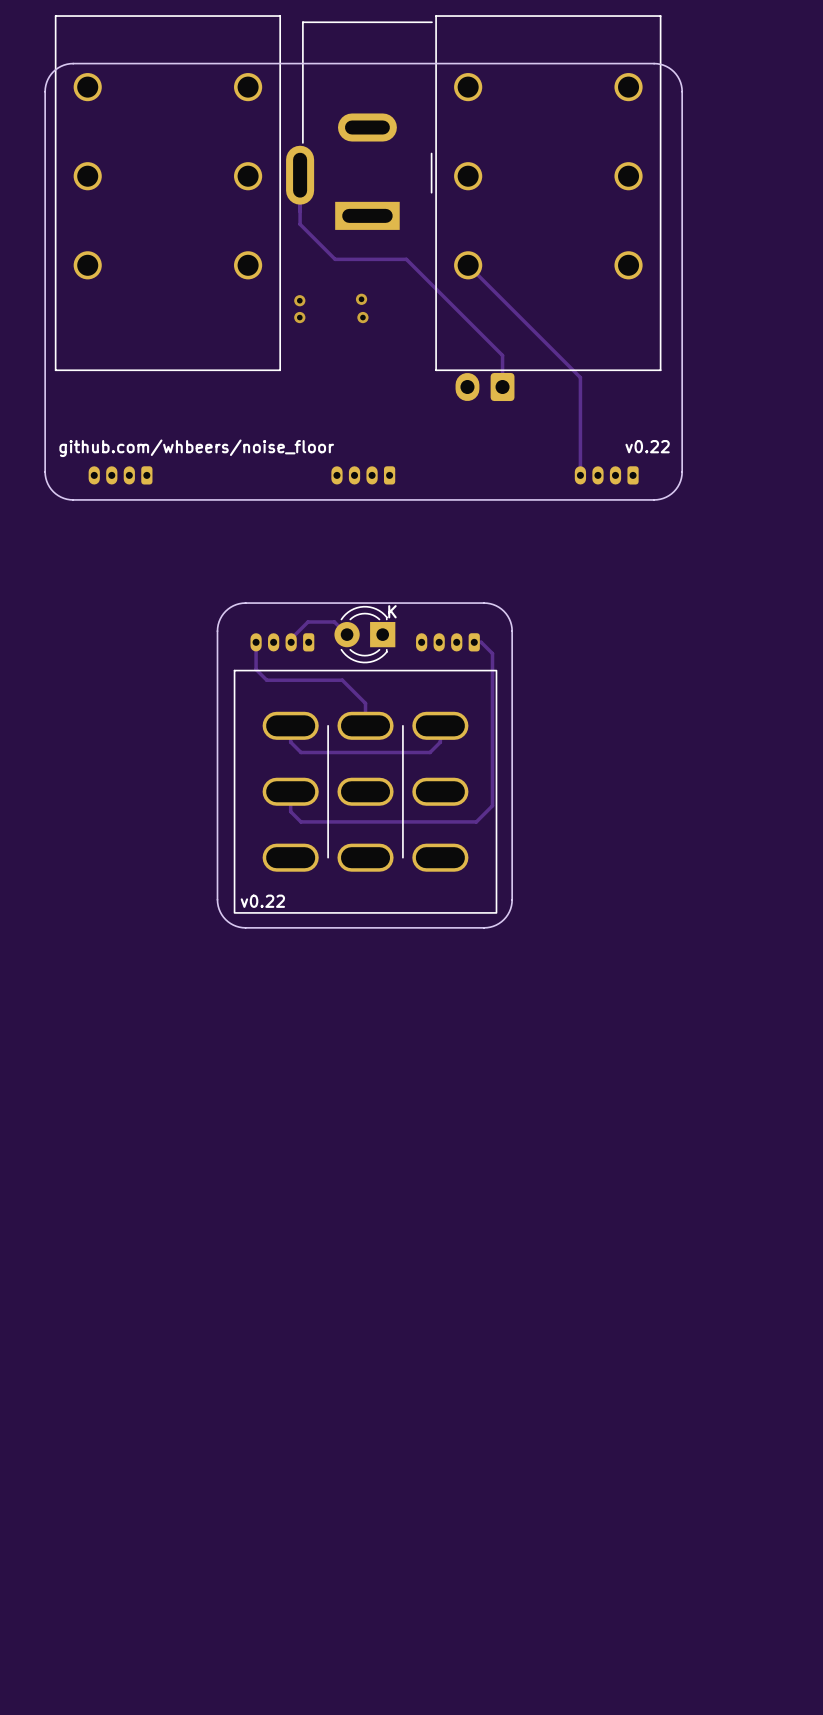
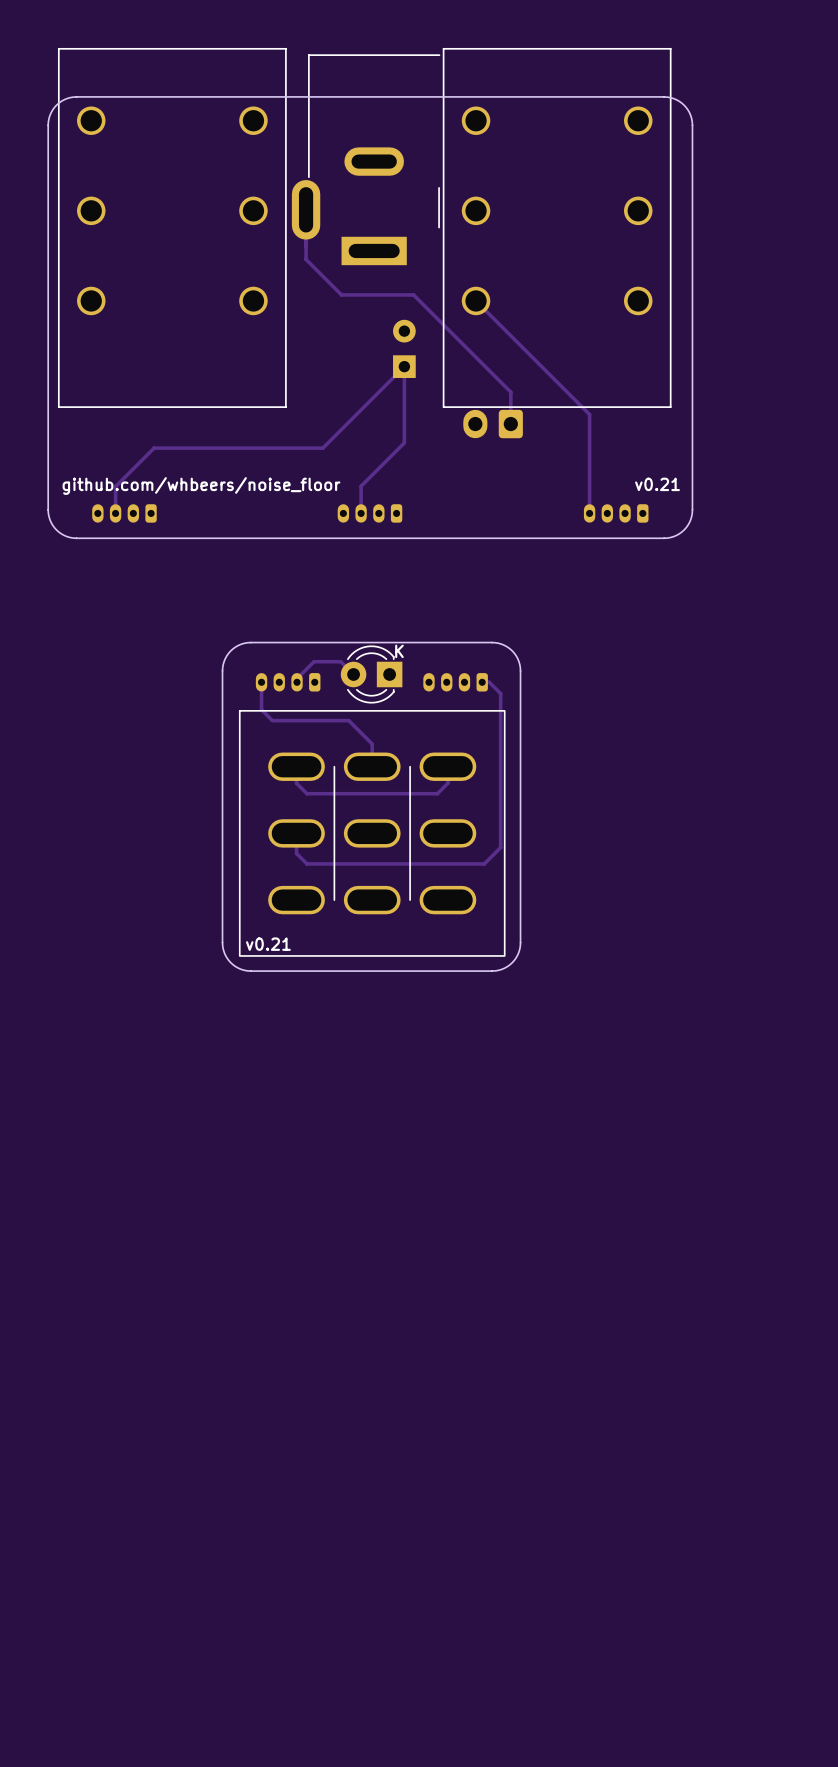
via: (361, 299) -> none
via: (299, 300) -> none
part: none -> (404, 348)
via: (299, 317) -> none
via: (362, 317) -> none
text: github.com/whbeers/noise_floor v0.22 (364, 448) -> github.com/whbeers/noise_floor v0.21 (371, 486)
track: none -> (361, 513) (361, 486) (404, 442) (404, 366) (322, 448) (154, 448) (115, 486) (115, 513)
text: v0.22 (262, 901) -> v0.21 (268, 944)

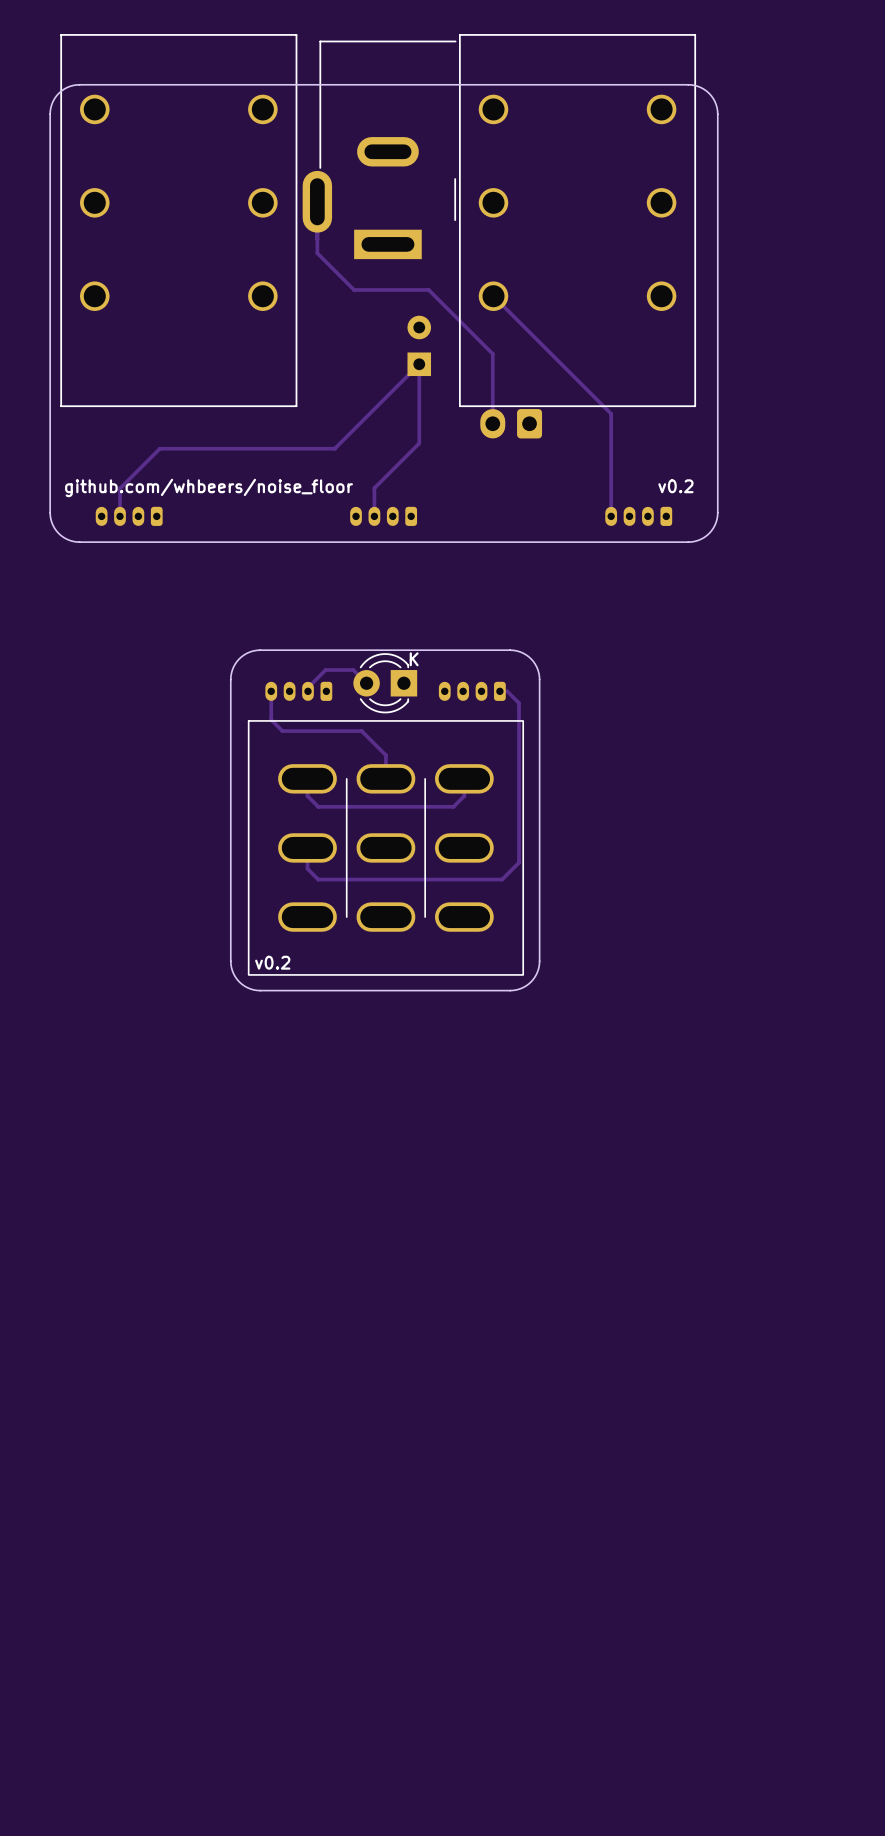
track: (475, 356) (510, 392) (510, 424) -> (492, 353) (492, 423)
text: github.com/whbeers/noise_floor v0.21 (371, 486) -> github.com/whbeers/noise_floor v0.2 (379, 487)
text: v0.21 (268, 944) -> v0.2 (272, 962)

